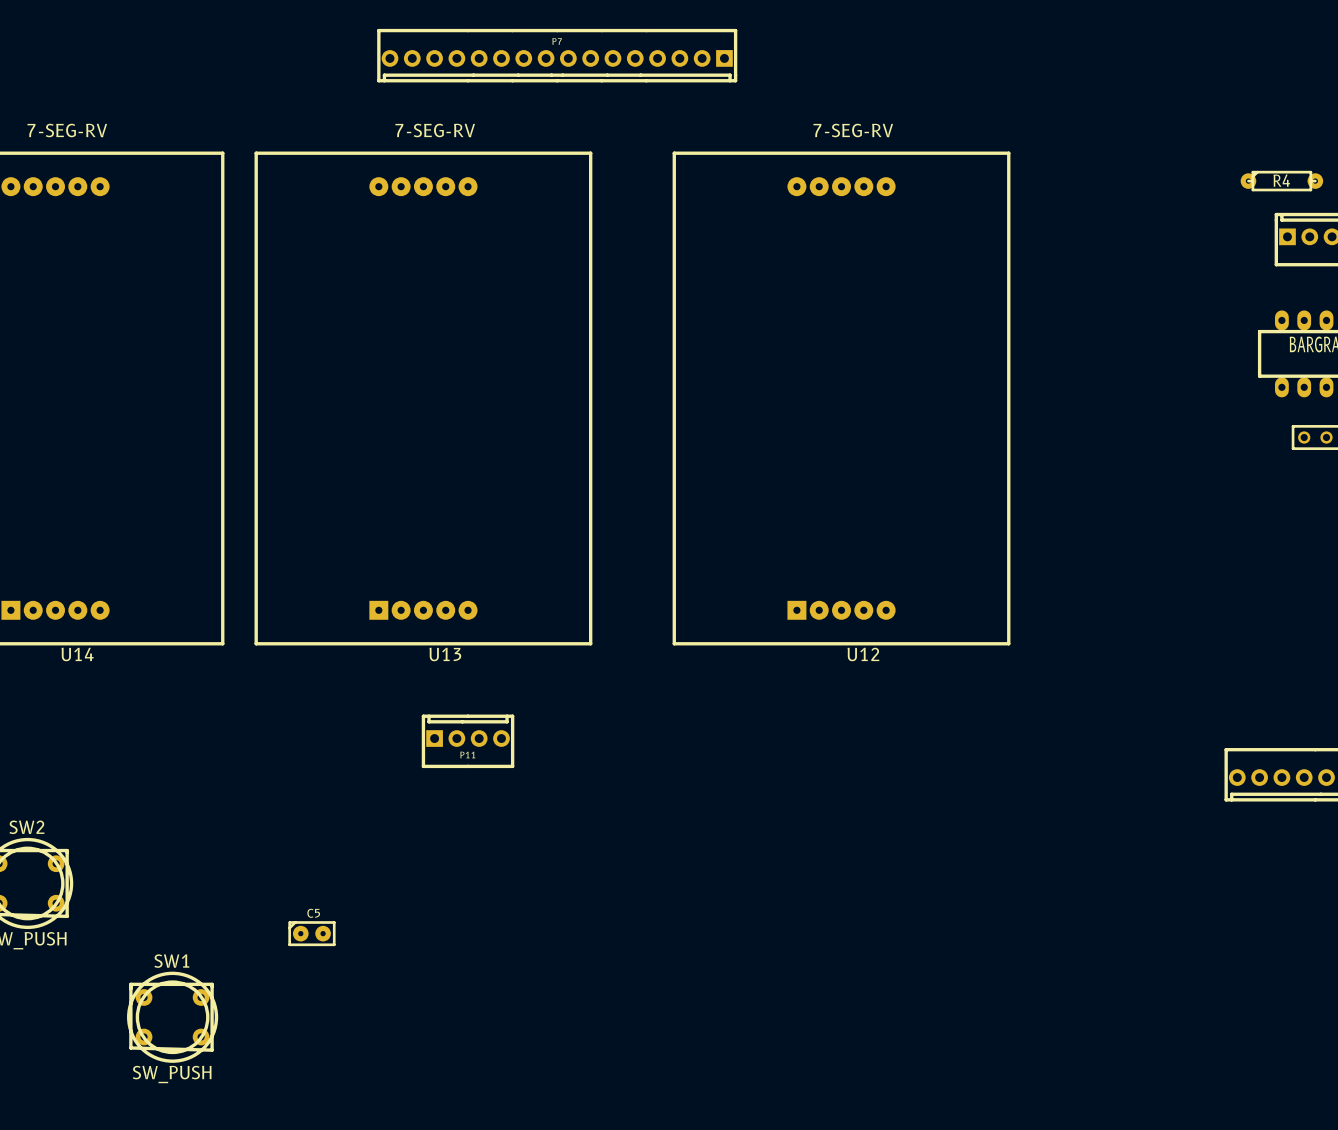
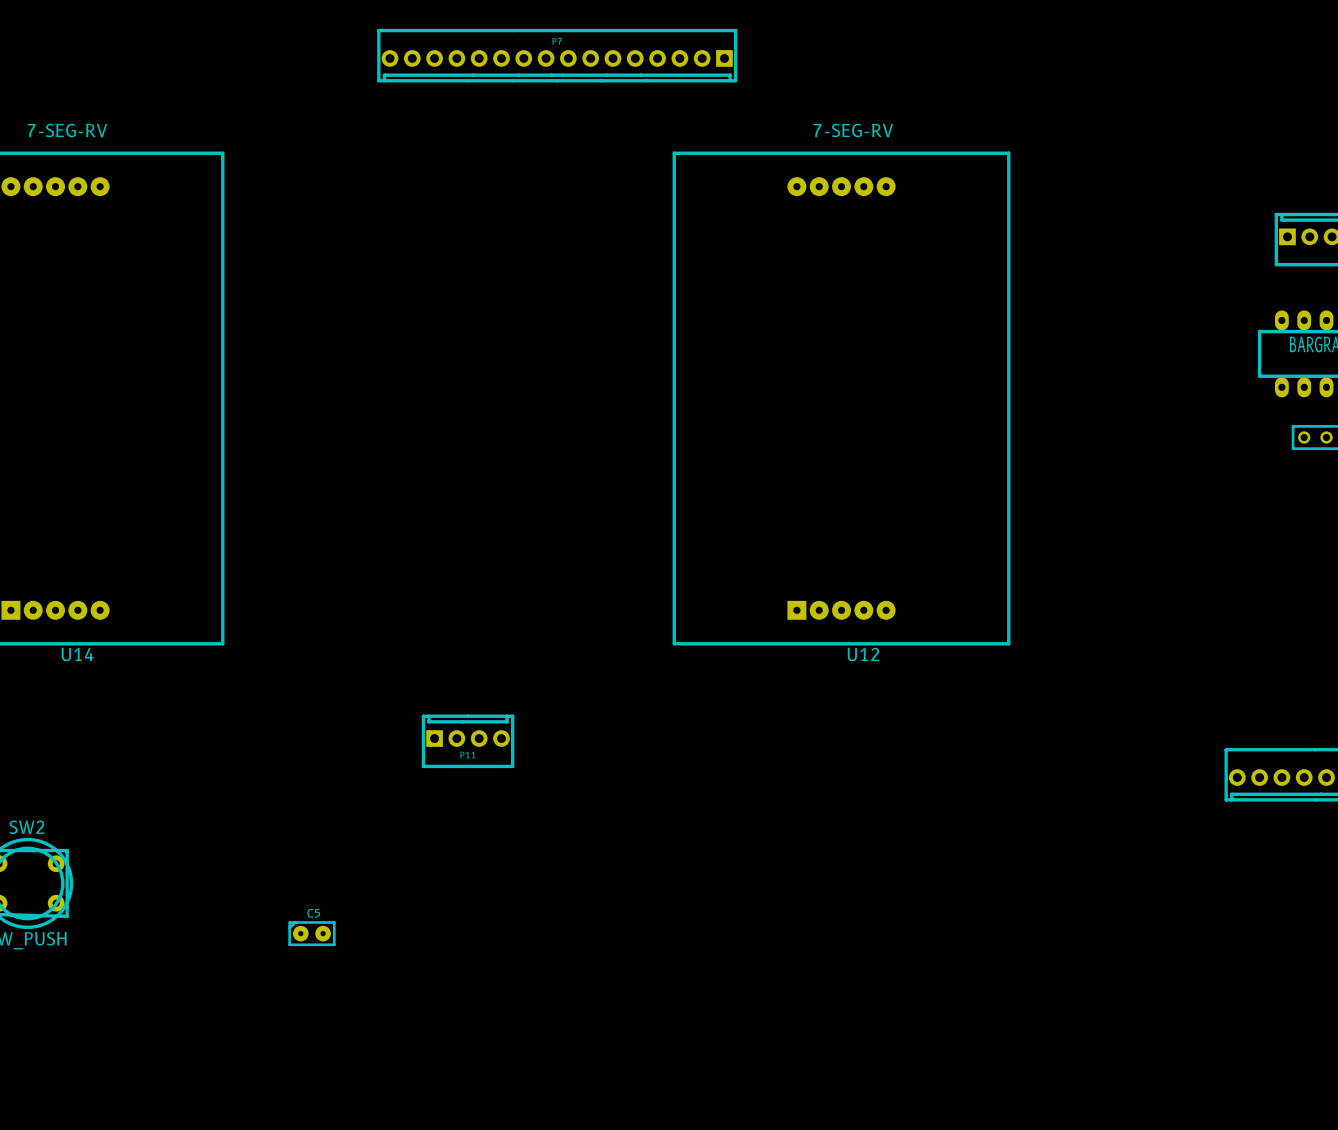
R4: (1281, 181) -> none
U13: 7-SEG-RV (423, 398) -> none
SW1: SW_PUSH (172, 1017) -> none

